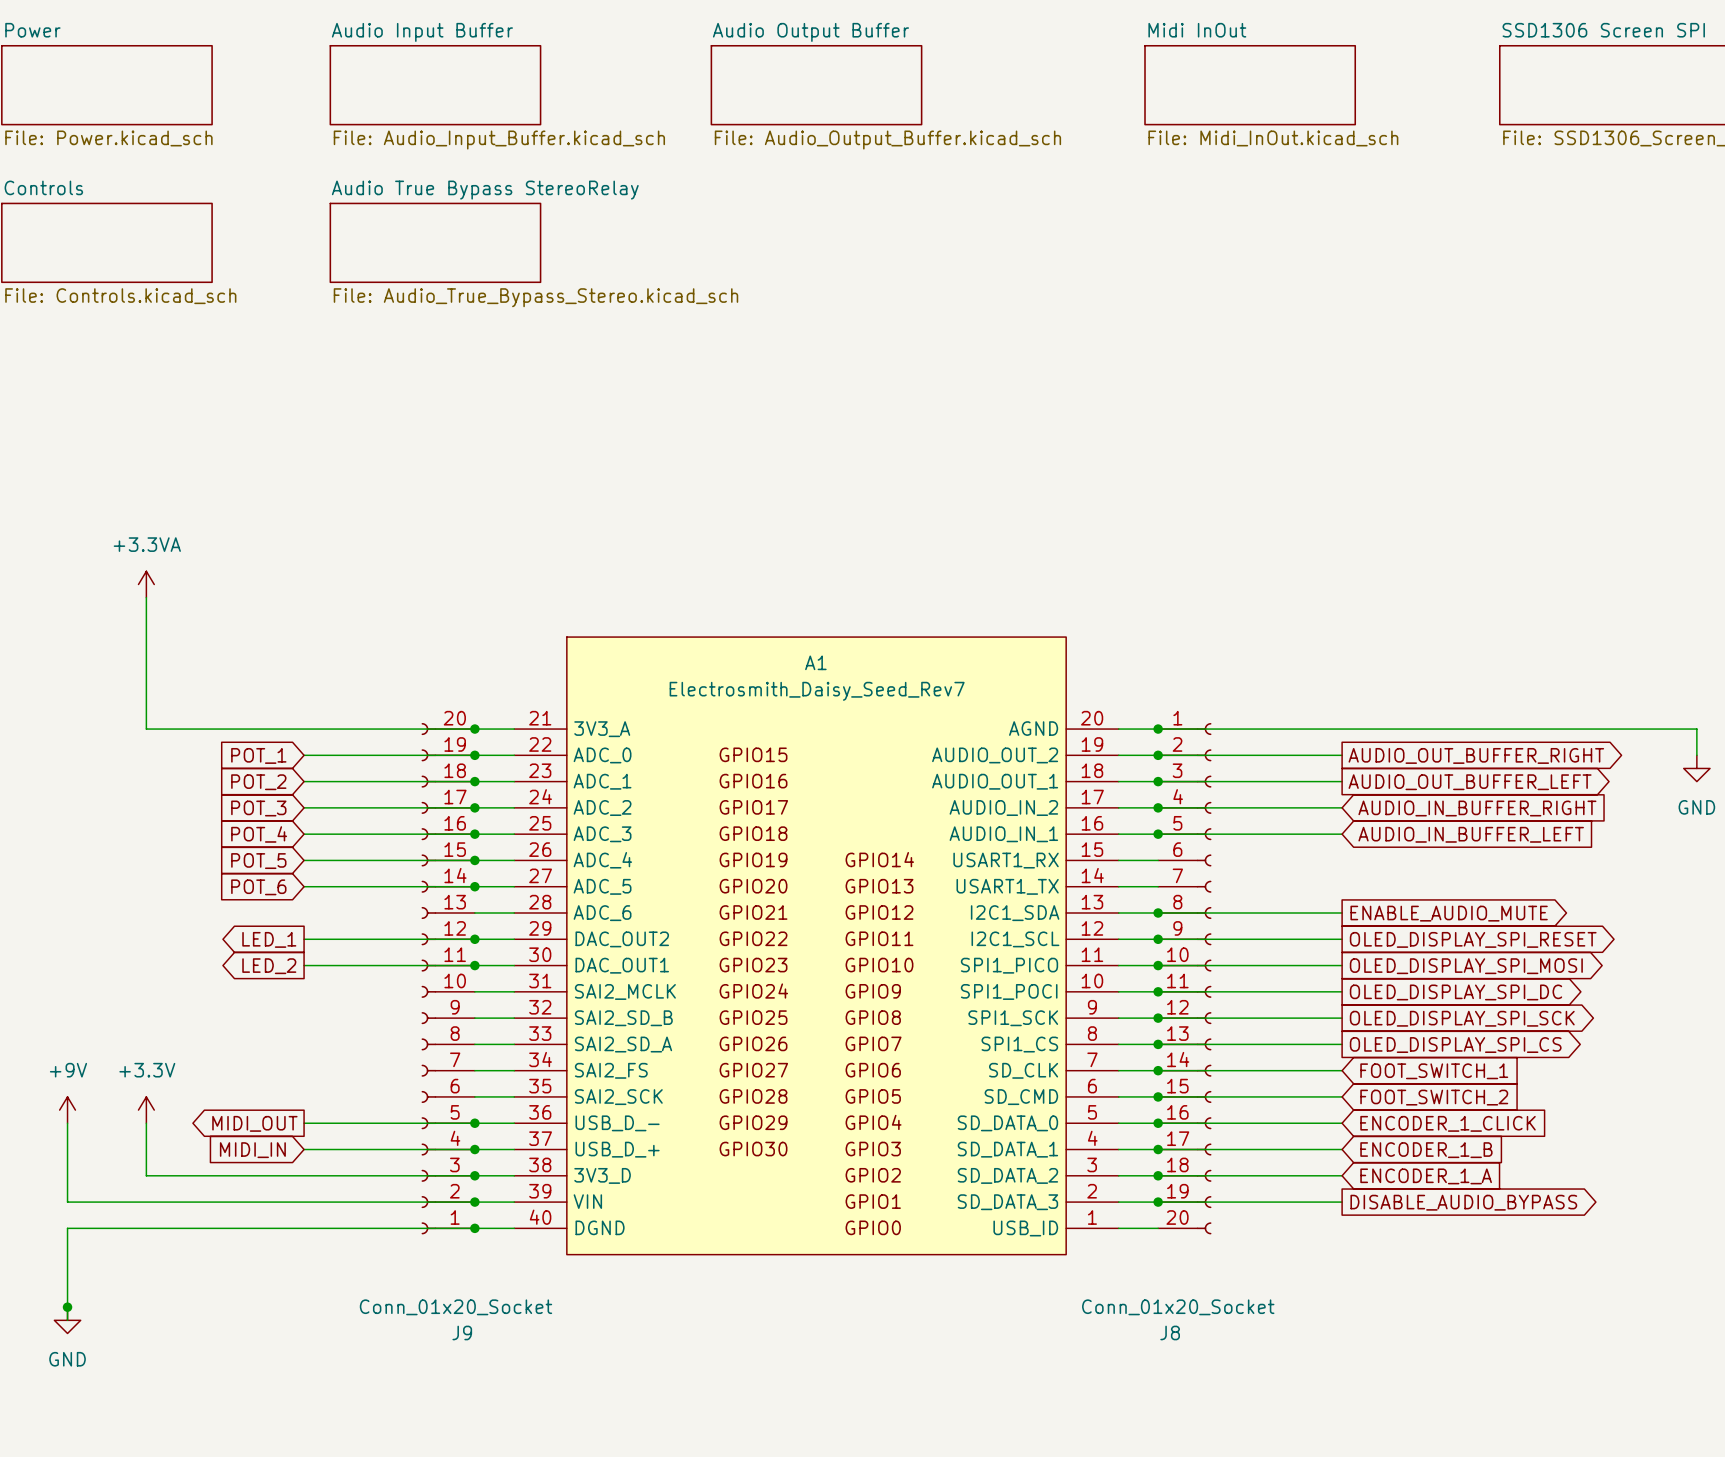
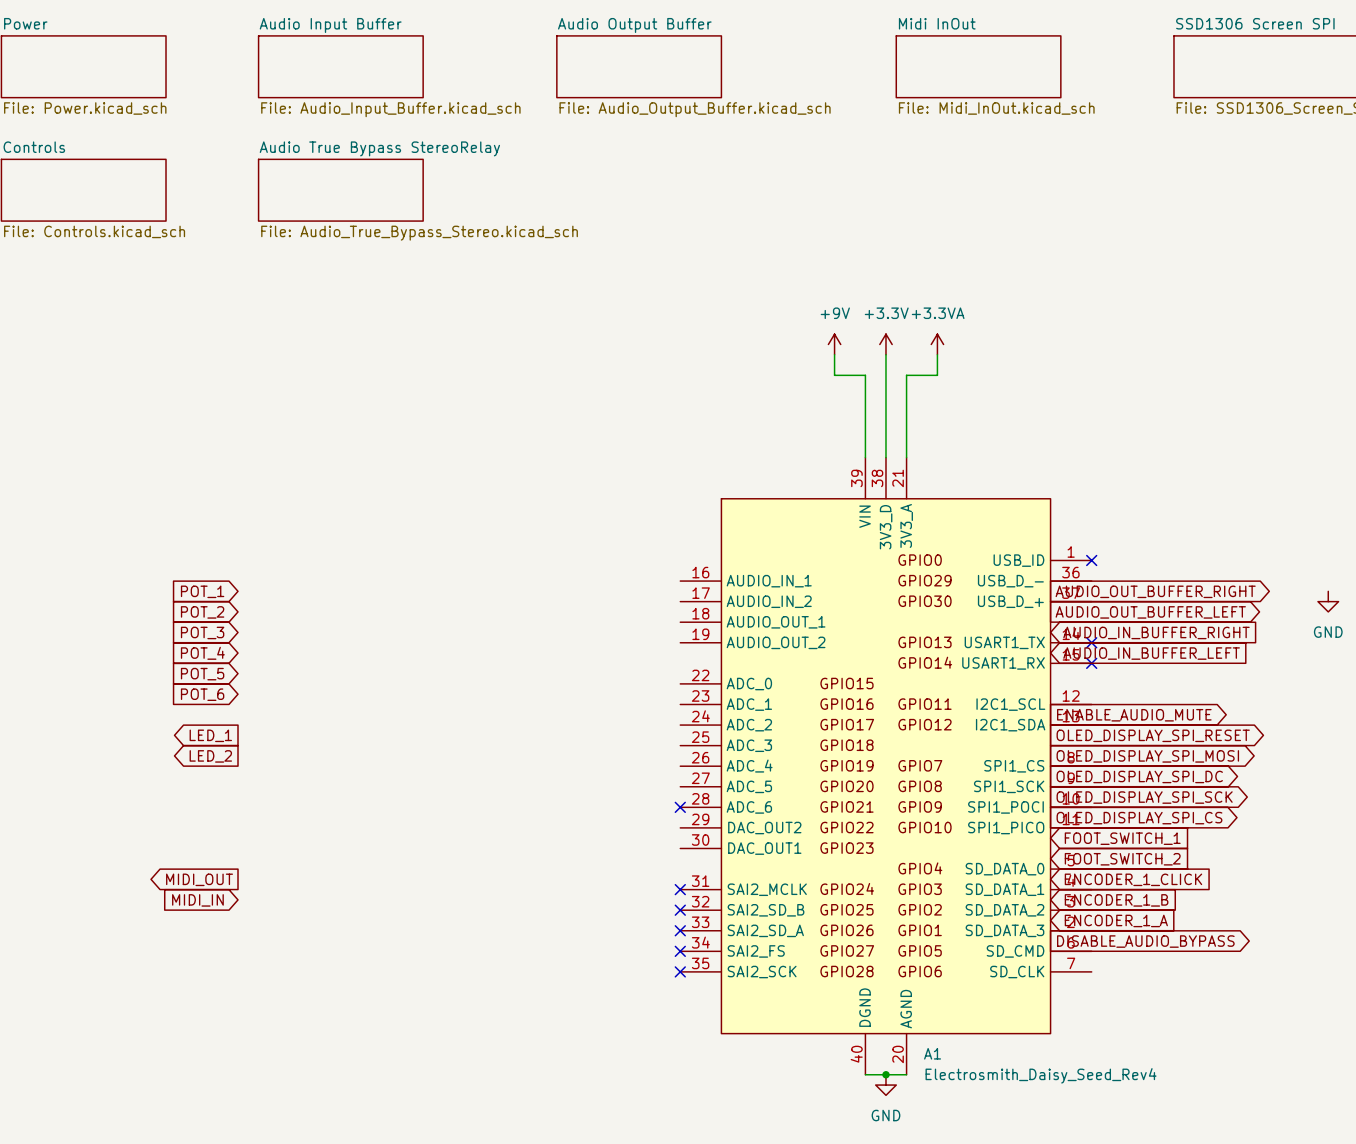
power symbol: none -> +9V (834, 344)
power symbol: none -> +3.3V (885, 344)
power symbol: none -> +3.3VA (937, 344)
wire: none -> (834, 354) (834, 375) (865, 375) (865, 457)
wire: none -> (885, 354) (885, 457)
wire: none -> (937, 354) (937, 375) (906, 375) (906, 457)
power symbol: +3.3VA (146, 584) -> none
wire: (146, 597) (146, 729) (514, 729) -> none
A1 symbol: [514, 637, 1119, 1255] -> [680, 457, 1092, 1075]
A1 name position: A1 (815, 662) -> A1 (932, 1053)
A1 value: Electrosmith_Daisy_Seed_Rev7 (817, 691) -> Electrosmith_Daisy_Seed_Rev4 (1041, 1075)
no-connect mark: none -> (1091, 560)
junction: (474, 729) -> none
wire: (1118, 729) (1696, 729) (1696, 755) -> none
junction: (1158, 729) -> none
wire: (304, 755) (514, 755) -> none
junction: (474, 755) -> none
junction: (1158, 755) -> none
wire: (304, 781) (514, 781) -> none
junction: (474, 781) -> none
junction: (1158, 781) -> none
wire: (304, 807) (514, 807) -> none
junction: (474, 807) -> none
junction: (1158, 807) -> none
no-connect mark: none -> (1091, 642)
wire: (304, 834) (514, 834) -> none
junction: (474, 834) -> none
junction: (1158, 834) -> none
no-connect mark: none -> (1091, 663)
wire: (304, 860) (514, 860) -> none
junction: (474, 860) -> none
wire: (304, 886) (514, 886) -> none
junction: (474, 886) -> none
wire: (474, 913) (514, 913) -> none
junction: (1158, 913) -> none
wire: (304, 939) (514, 939) -> none
junction: (474, 939) -> none
junction: (1158, 939) -> none
wire: (304, 965) (514, 965) -> none
junction: (474, 965) -> none
junction: (1158, 965) -> none
J9: Conn_01x20_Socket (448, 978) -> none
J8: Conn_01x20_Socket (1184, 978) -> none
wire: (474, 991) (514, 991) -> none
junction: (1158, 991) -> none
wire: (474, 1018) (514, 1018) -> none
junction: (1158, 1018) -> none
no-connect mark: none -> (680, 807)
wire: (474, 1044) (514, 1044) -> none
junction: (1158, 1044) -> none
wire: (474, 1070) (514, 1070) -> none
junction: (1158, 1070) -> none
wire: (474, 1096) (514, 1096) -> none
junction: (1158, 1096) -> none
power symbol: +9V (67, 1110) -> none
power symbol: +3.3V (146, 1110) -> none
wire: (67, 1123) (67, 1202) (514, 1202) -> none
wire: (146, 1123) (146, 1175) (514, 1175) -> none
wire: (304, 1123) (514, 1123) -> none
junction: (474, 1123) -> none
junction: (1158, 1123) -> none
no-connect mark: none -> (680, 889)
wire: (304, 1149) (514, 1149) -> none
junction: (474, 1149) -> none
junction: (1158, 1149) -> none
no-connect mark: none -> (680, 910)
junction: (474, 1175) -> none
junction: (1158, 1175) -> none
no-connect mark: none -> (680, 930)
junction: (474, 1202) -> none
junction: (1158, 1202) -> none
no-connect mark: none -> (680, 951)
junction: (474, 1228) -> none
wire: (514, 1228) (67, 1228) (67, 1320) -> none
no-connect mark: none -> (680, 971)
junction: (67, 1307) -> none
power symbol: GND (67, 1320) -> none
wire: none -> (865, 1074) (906, 1074)
junction: none -> (885, 1074)
power symbol: none -> GND (885, 1085)

